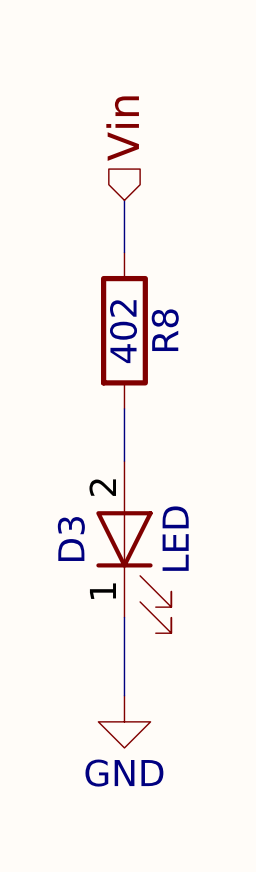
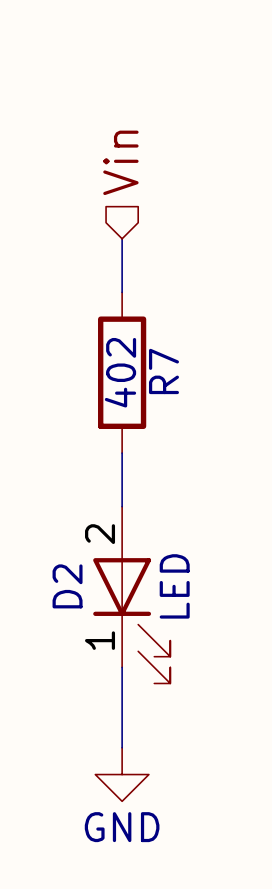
R8 name: R8 (165, 330) -> R7 (163, 371)
D3 name: D3 (71, 539) -> D2 (67, 586)

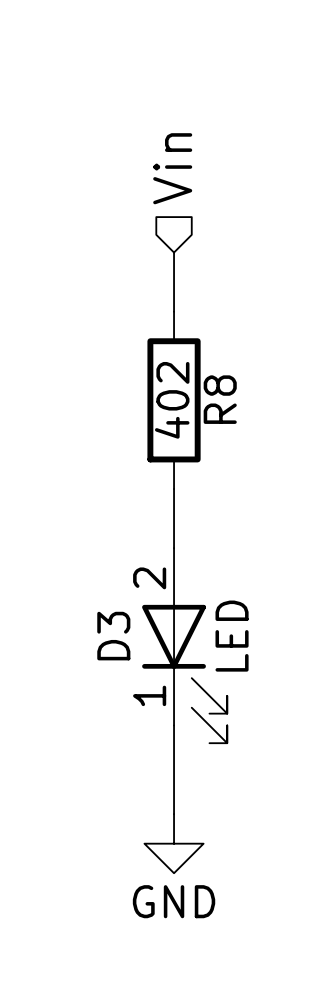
R7 name: R7 (163, 371) -> R8 (220, 399)
D2 name: D2 (67, 586) -> D3 (113, 636)

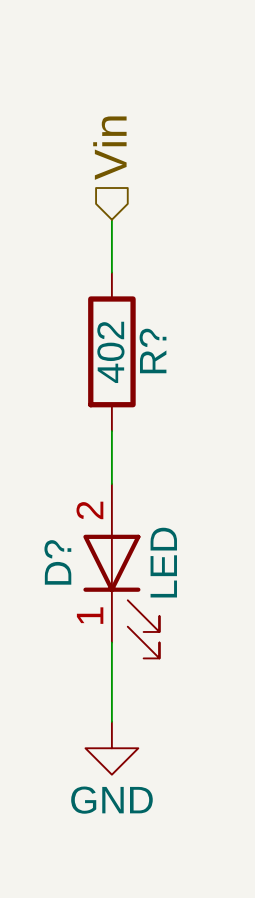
R8 name: R8 (220, 399) -> R? (153, 350)
D3 name: D3 (113, 636) -> D? (57, 562)

